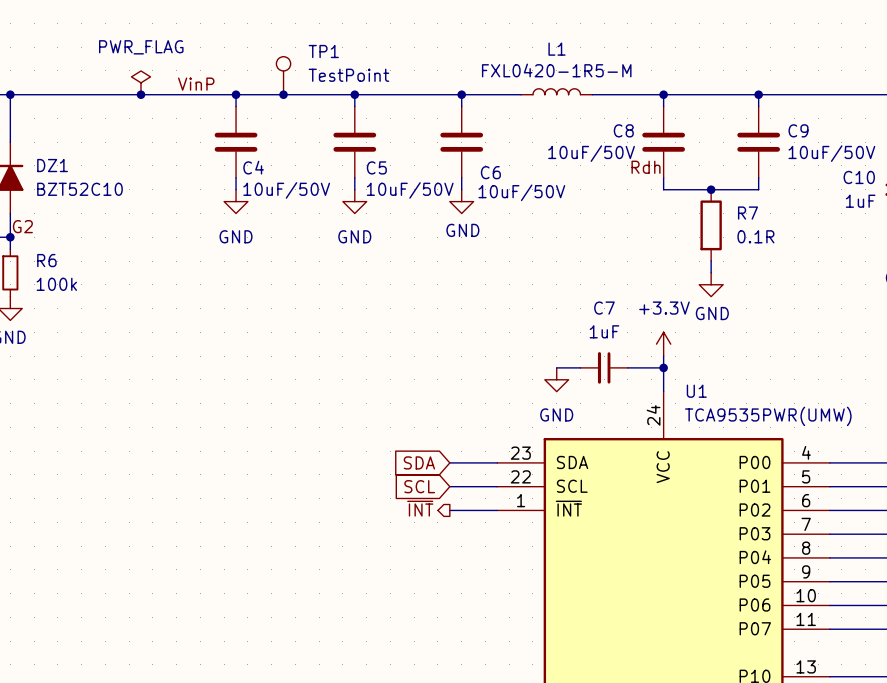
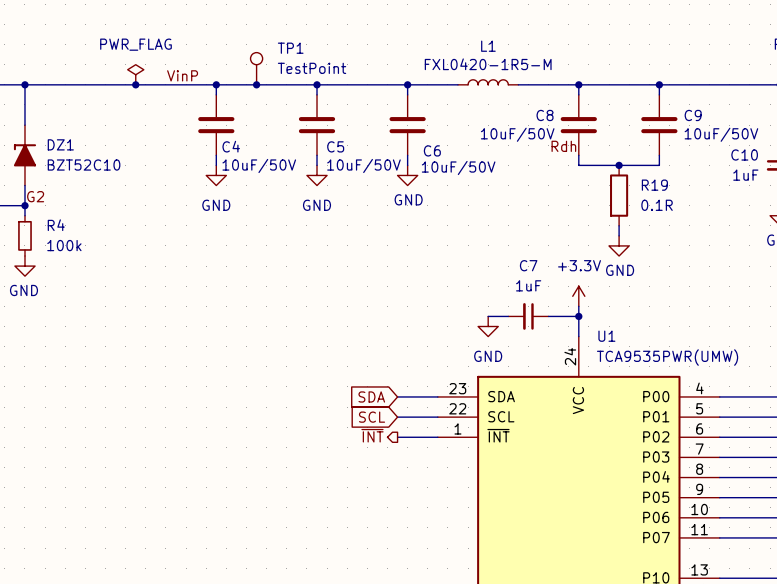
R7 name: R7 (747, 213) -> R19 (654, 185)
R6 name: R6 (46, 260) -> R4 (56, 225)

